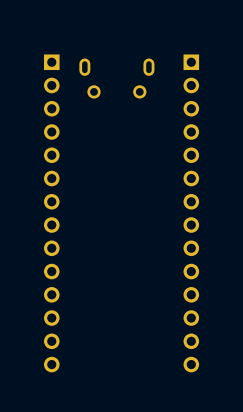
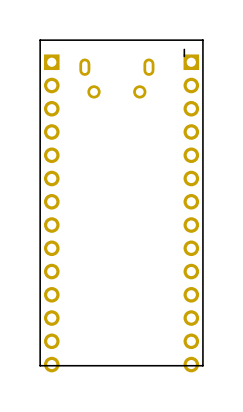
board edge: none -> (202, 40) (202, 365) (40, 365) (40, 40) (202, 40)
board edge: none -> (184, 49) (184, 56)

